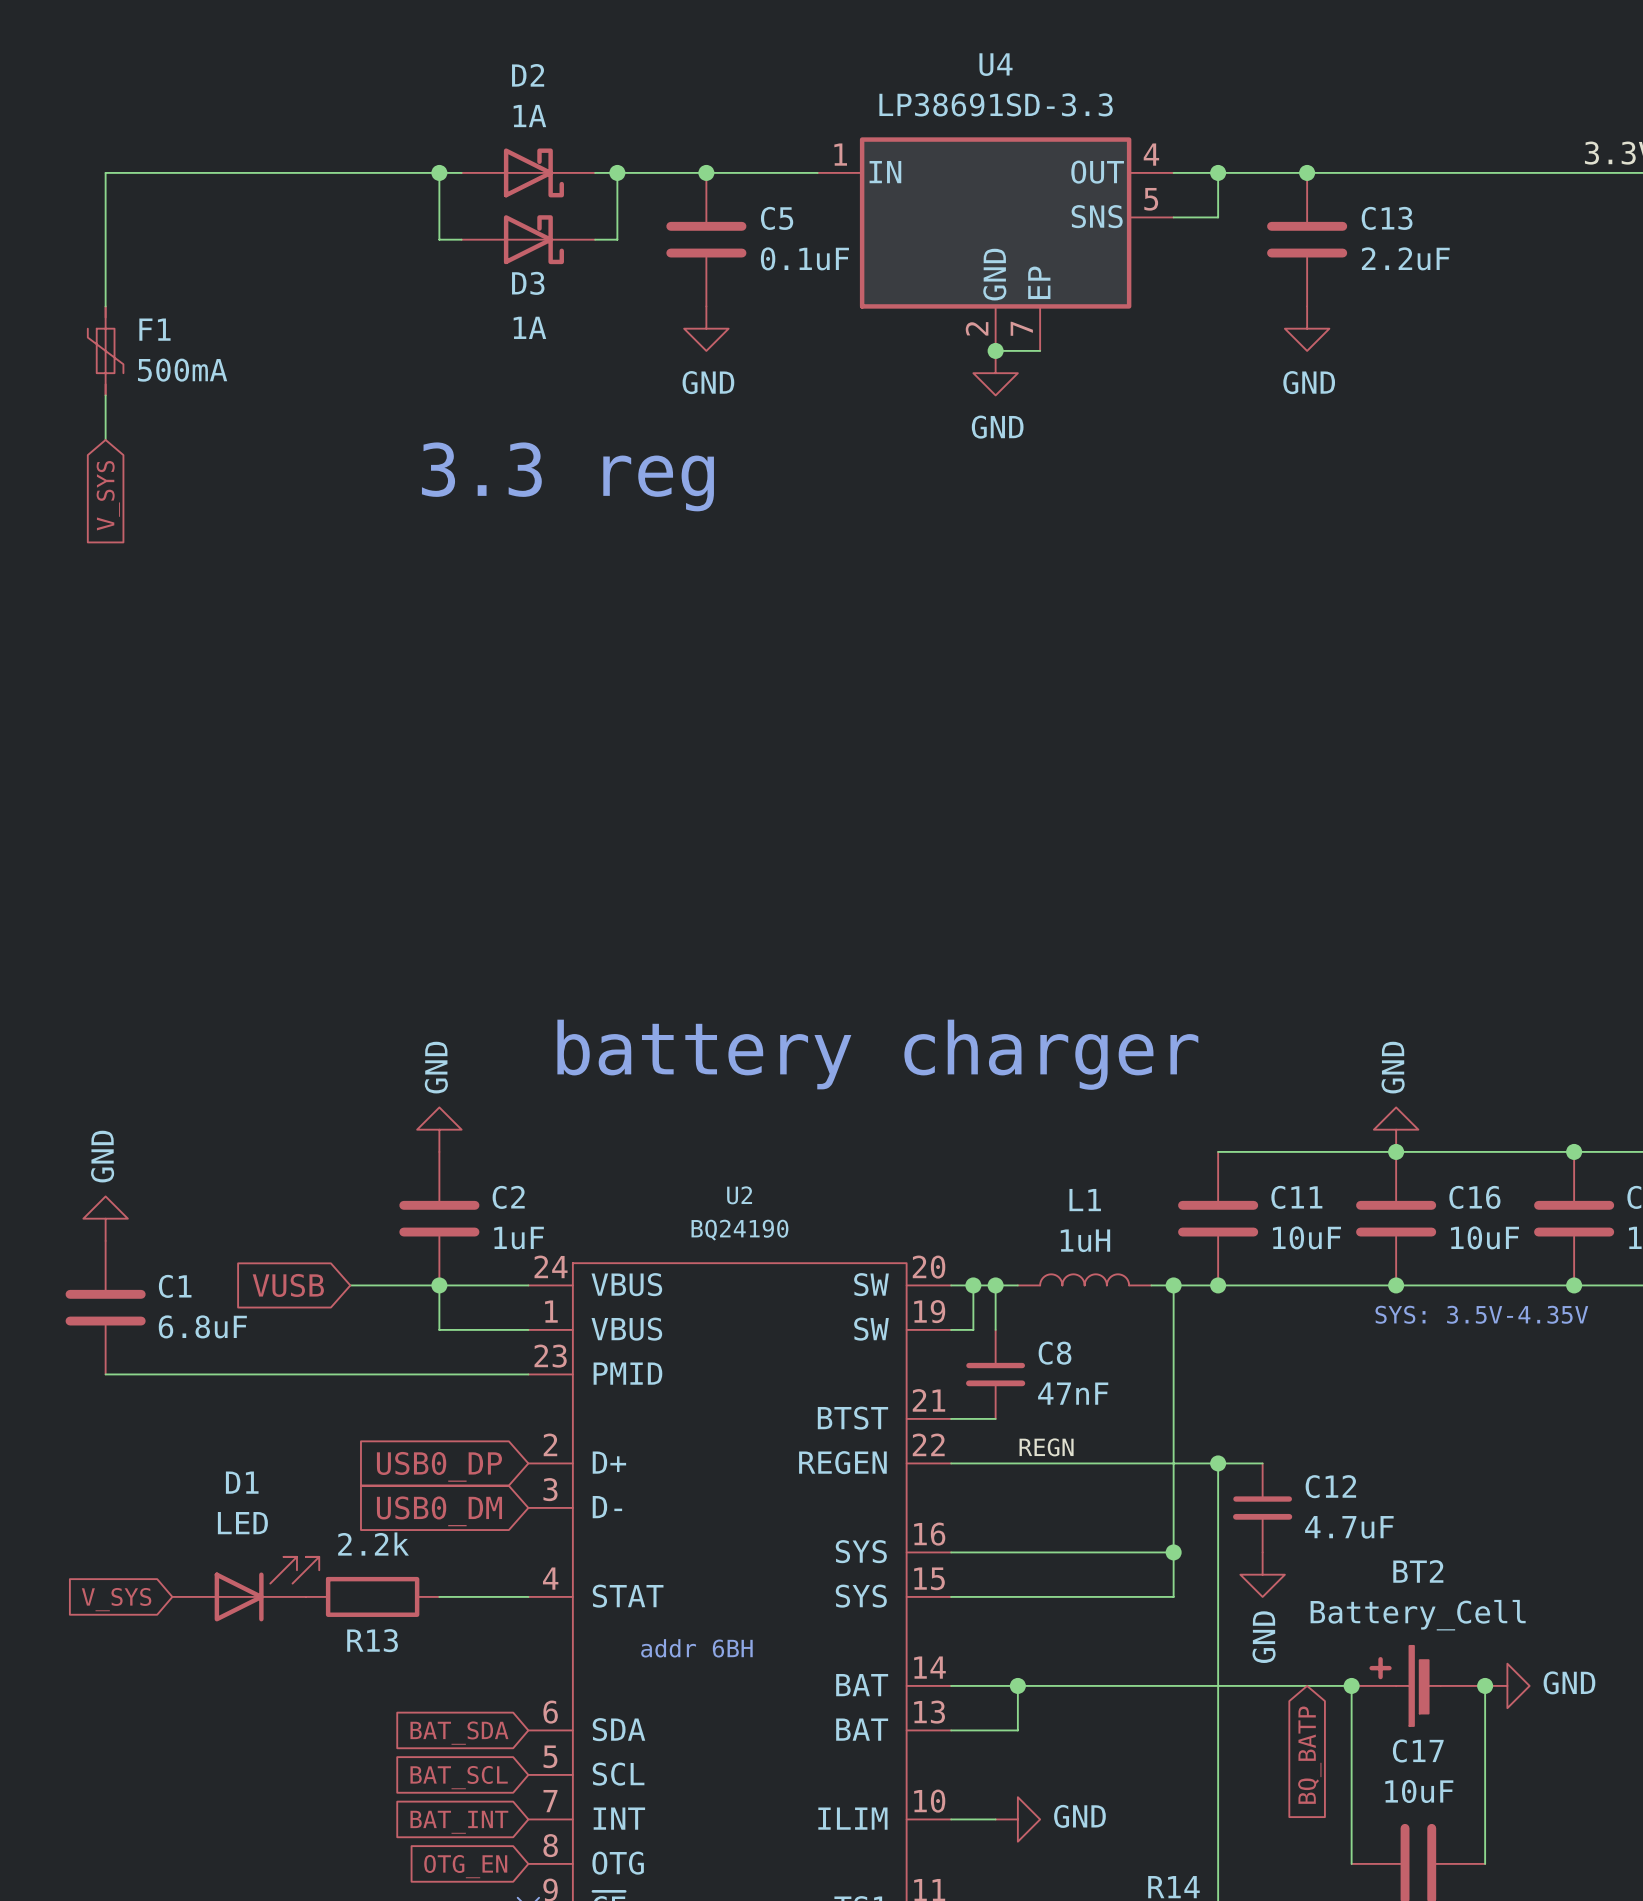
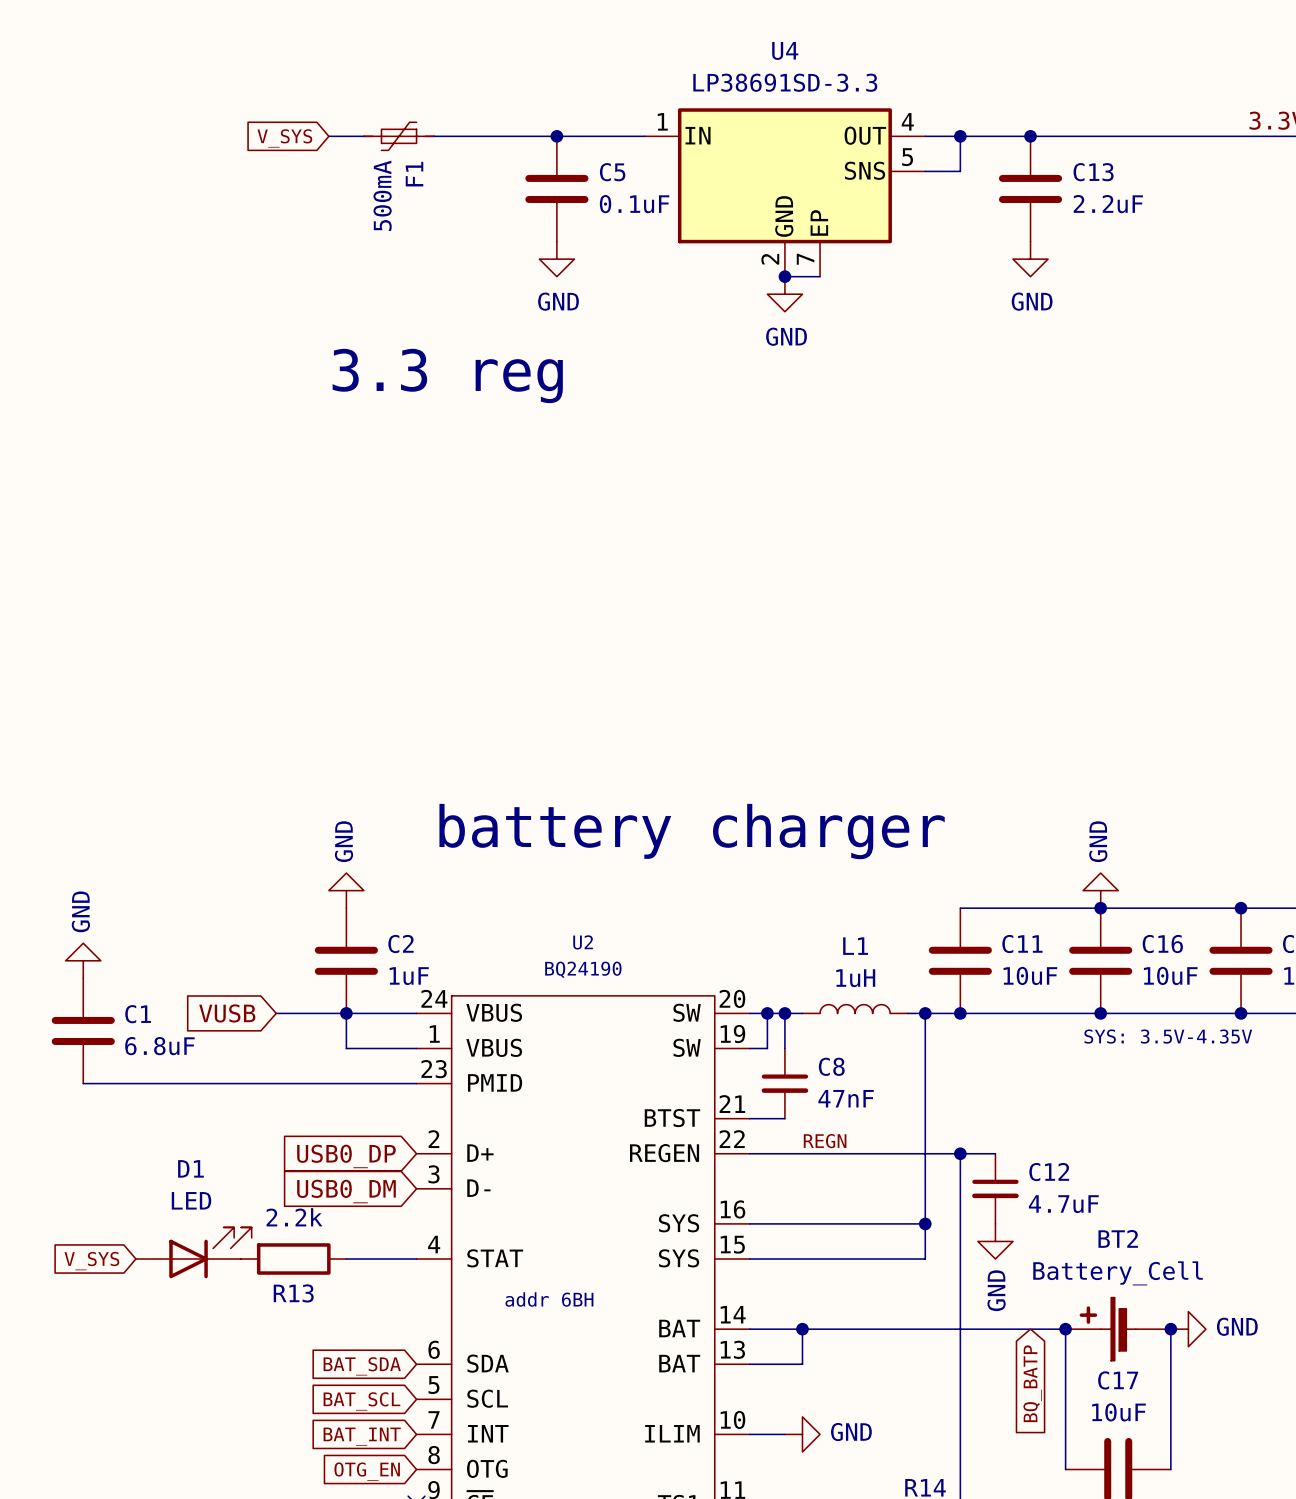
wire: (417, 172) (105, 172) (105, 306) -> none
wire: (439, 172) (439, 239) (461, 239) -> none
junction: (439, 172) -> none
D2: 1A (528, 172) -> none
wire: (617, 172) (617, 239) (595, 239) -> none
junction: (617, 172) -> none
D3: 1A (528, 239) -> none
F1 rotation: 0° (105, 350) -> 90° clockwise (399, 136)
F1 position: (105, 350) -> (399, 136)
wire: (105, 395) (105, 439) -> none
global label rotation: 0° (108, 495) -> 90° clockwise (284, 138)
global label position: V_SYS (108, 495) -> V_SYS (284, 138)

